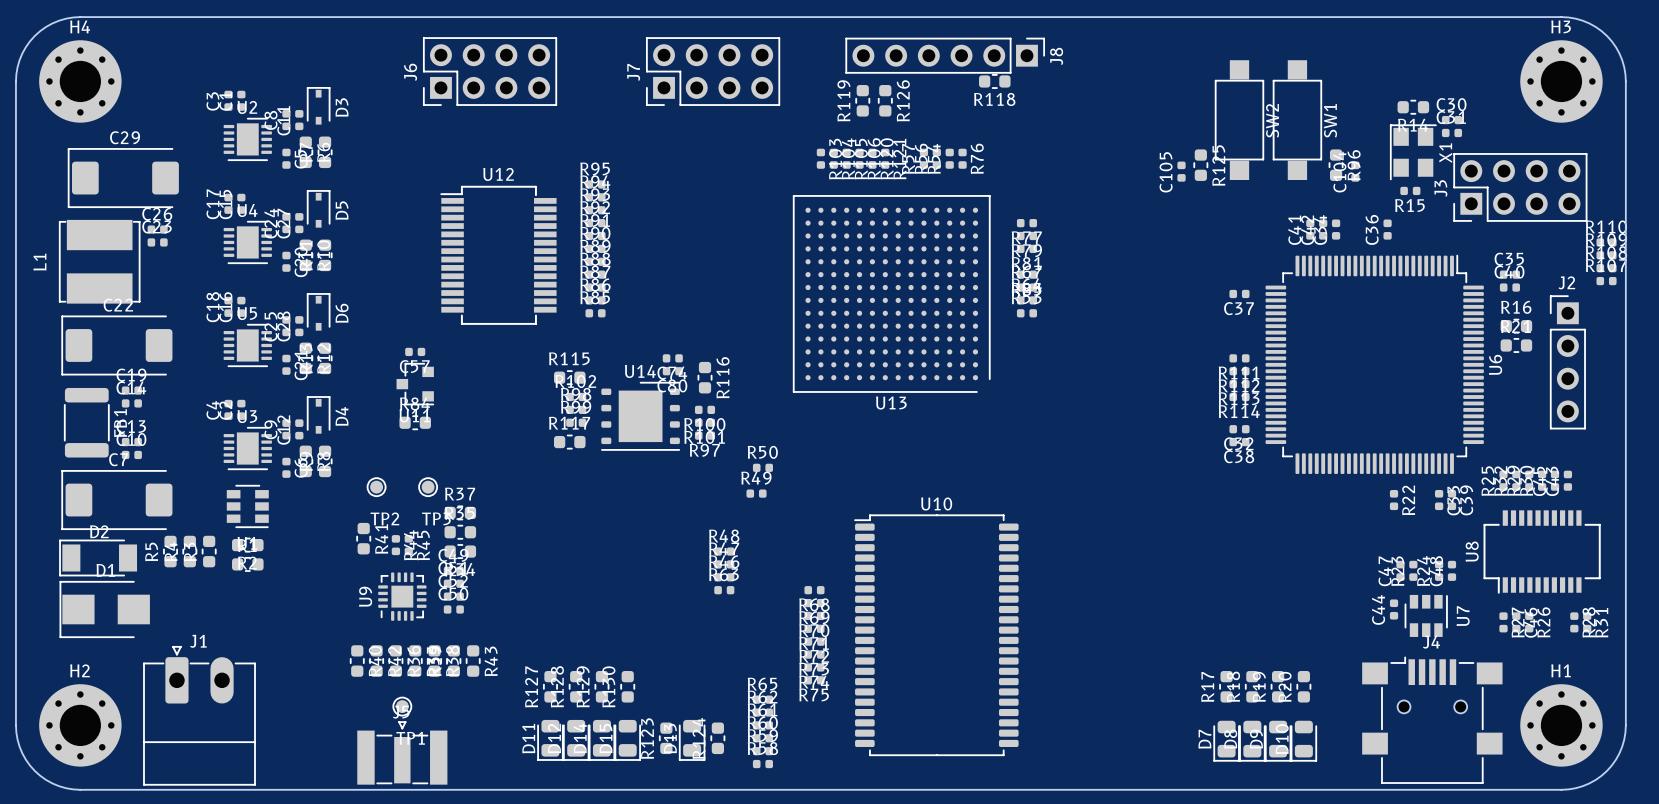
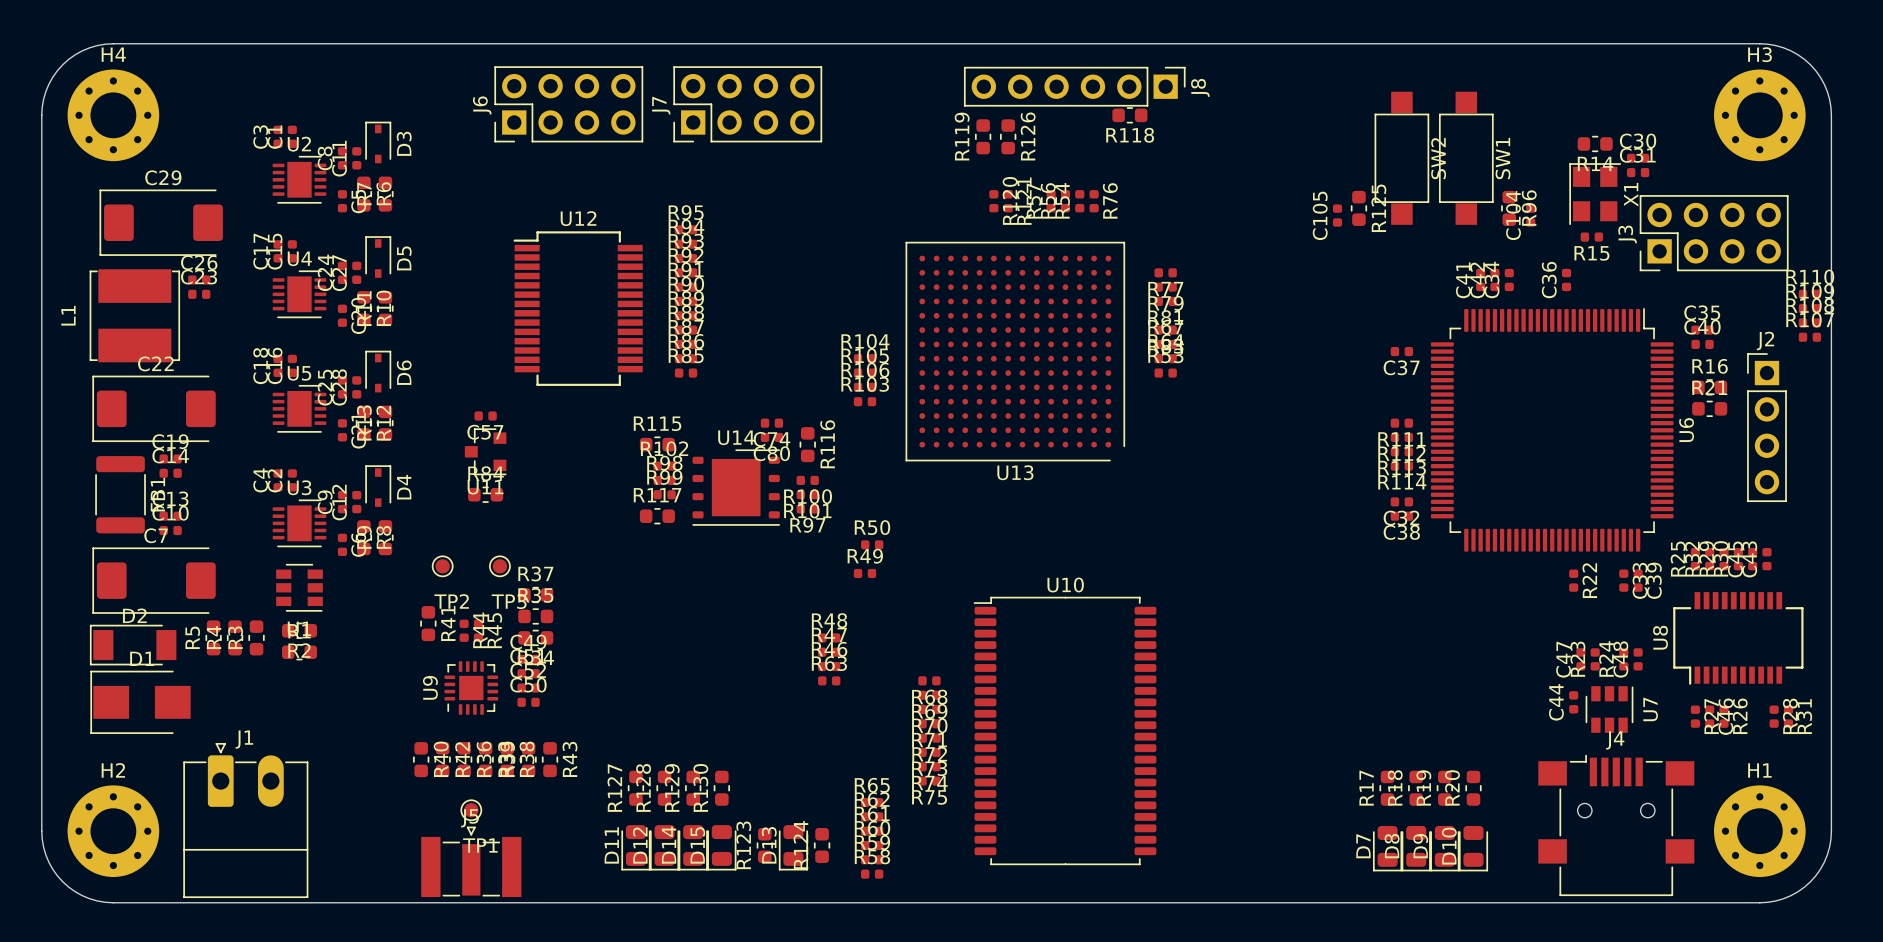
J7 position: (713, 71) -> (747, 104)
R103 rotation: 0° (820, 158) -> 90° clockwise (865, 401)
R103 position: (820, 158) -> (865, 401)
R104 rotation: 0° (833, 158) -> 90° clockwise (865, 358)
R104 position: (833, 158) -> (865, 358)
R105 rotation: 0° (846, 158) -> 90° clockwise (865, 373)
R105 position: (846, 158) -> (865, 373)
R106 rotation: 0° (859, 158) -> 90° clockwise (865, 387)
R106 position: (859, 158) -> (865, 387)

